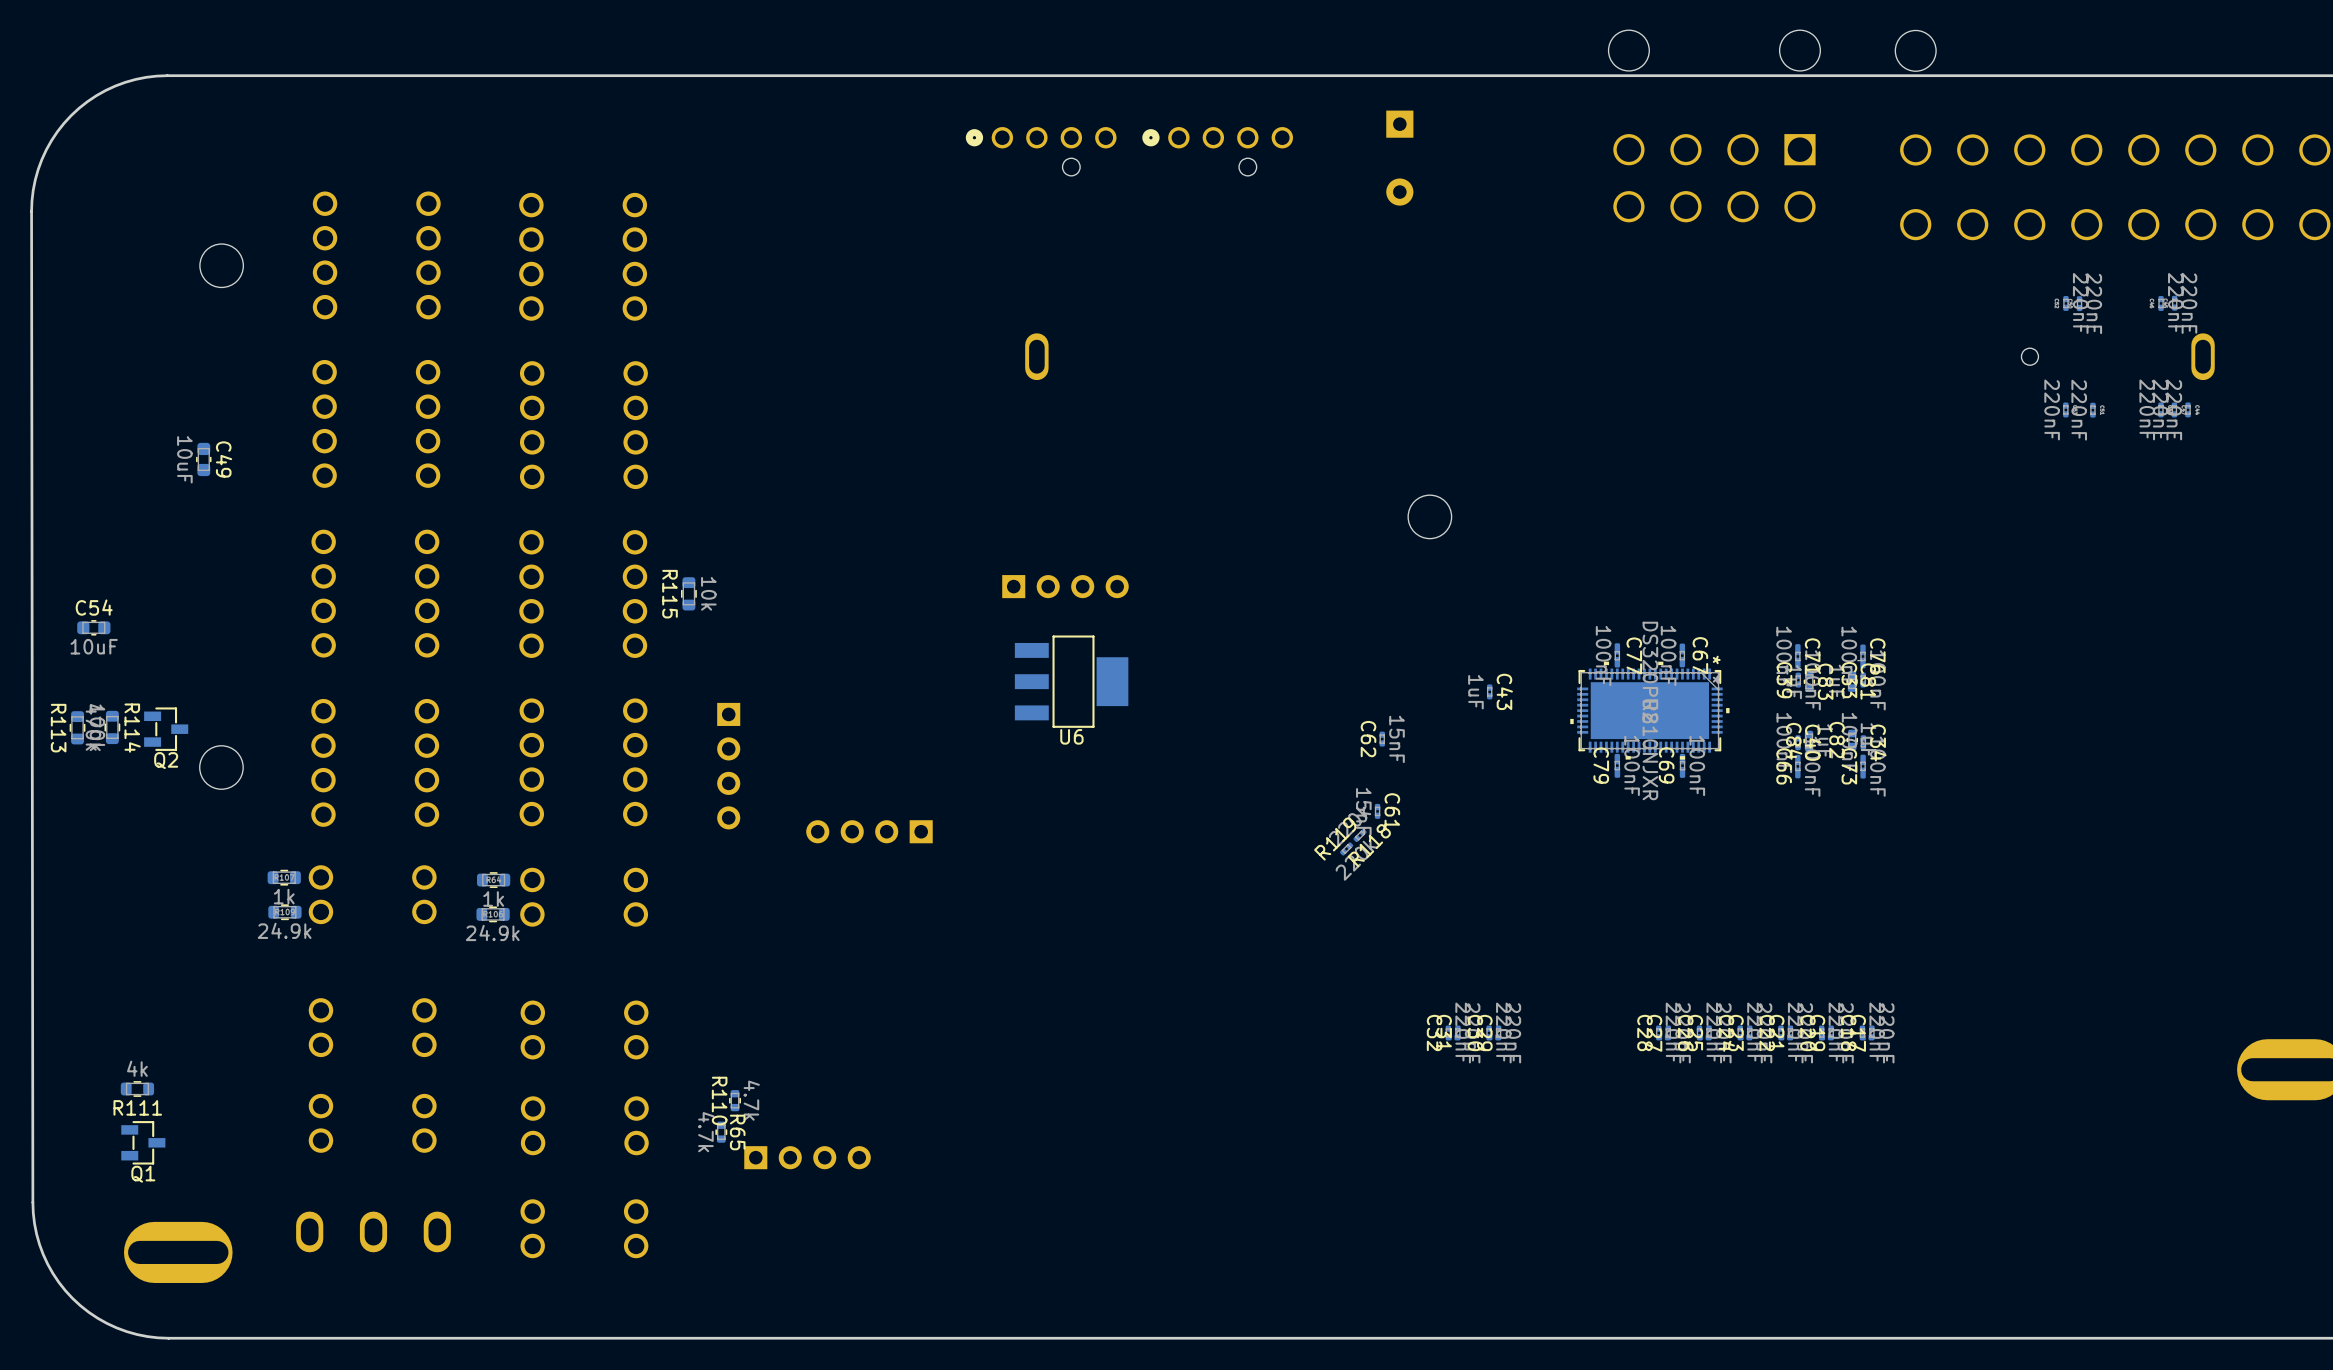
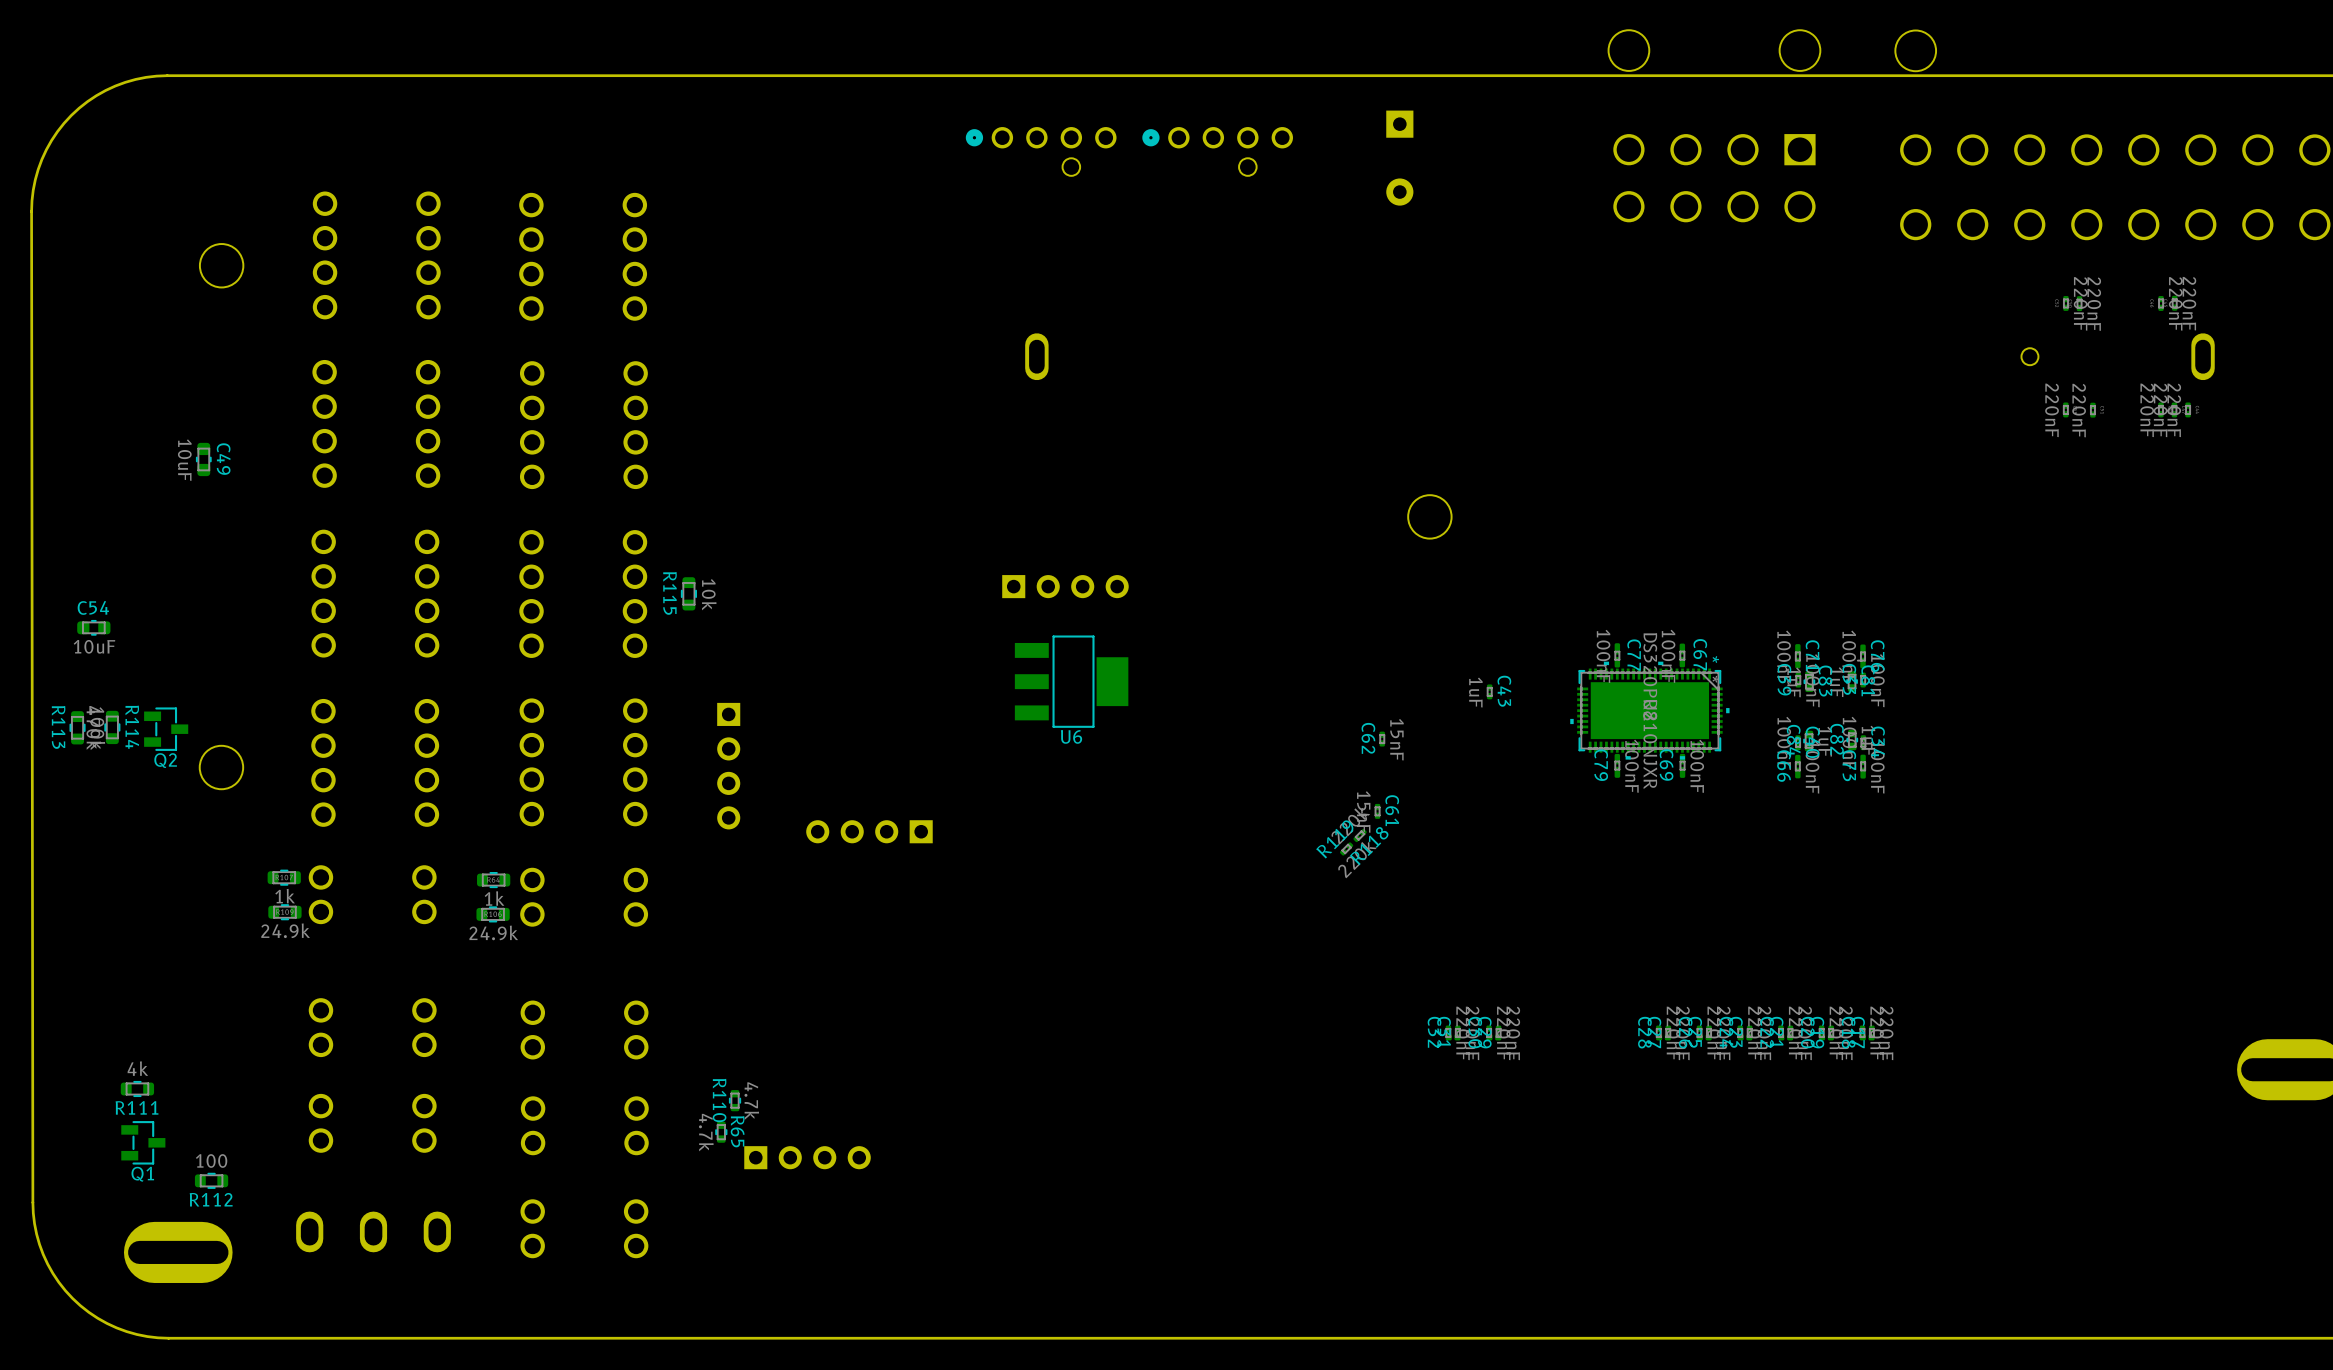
R112: none -> 100 (211, 1180)

